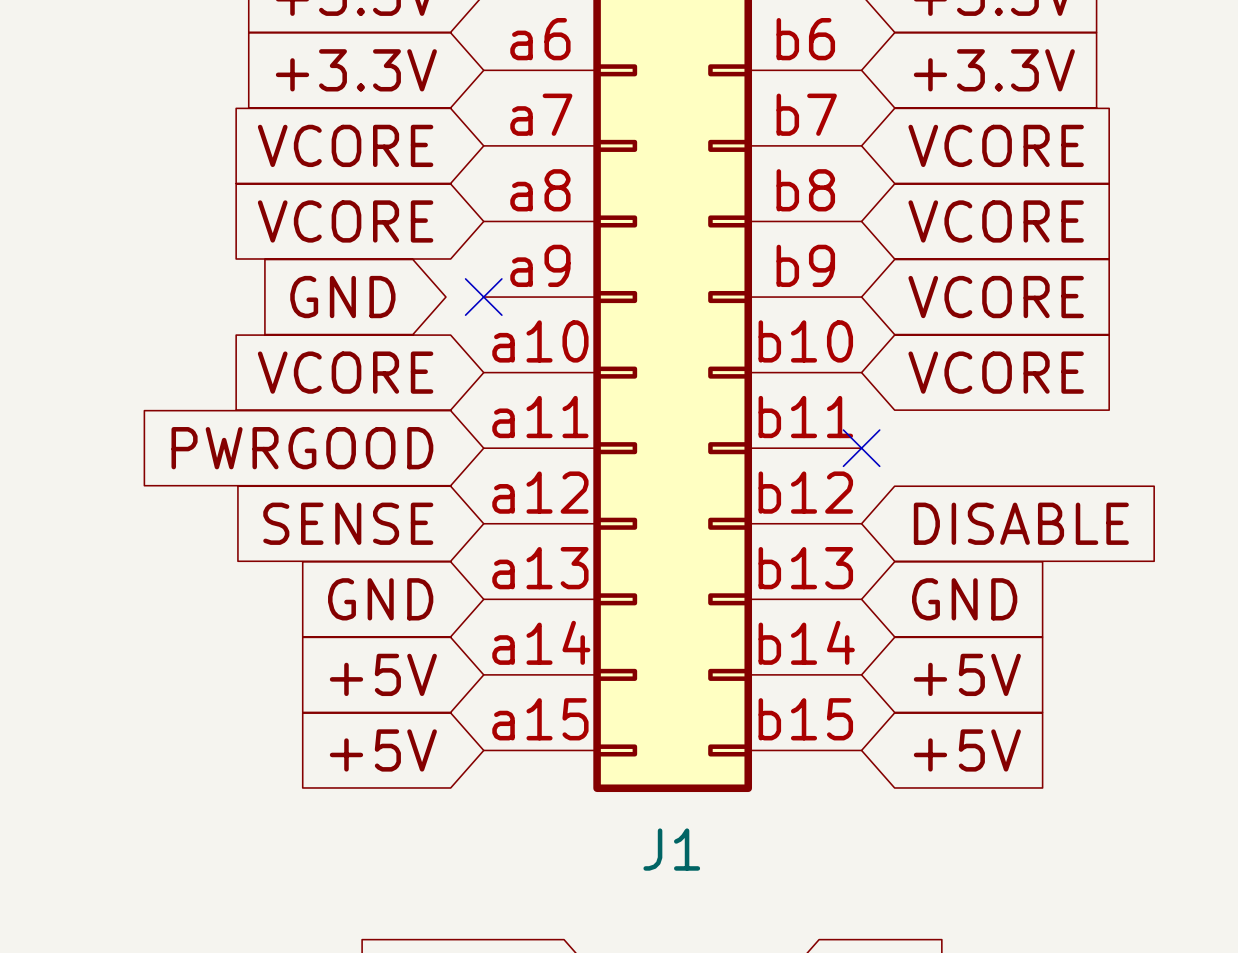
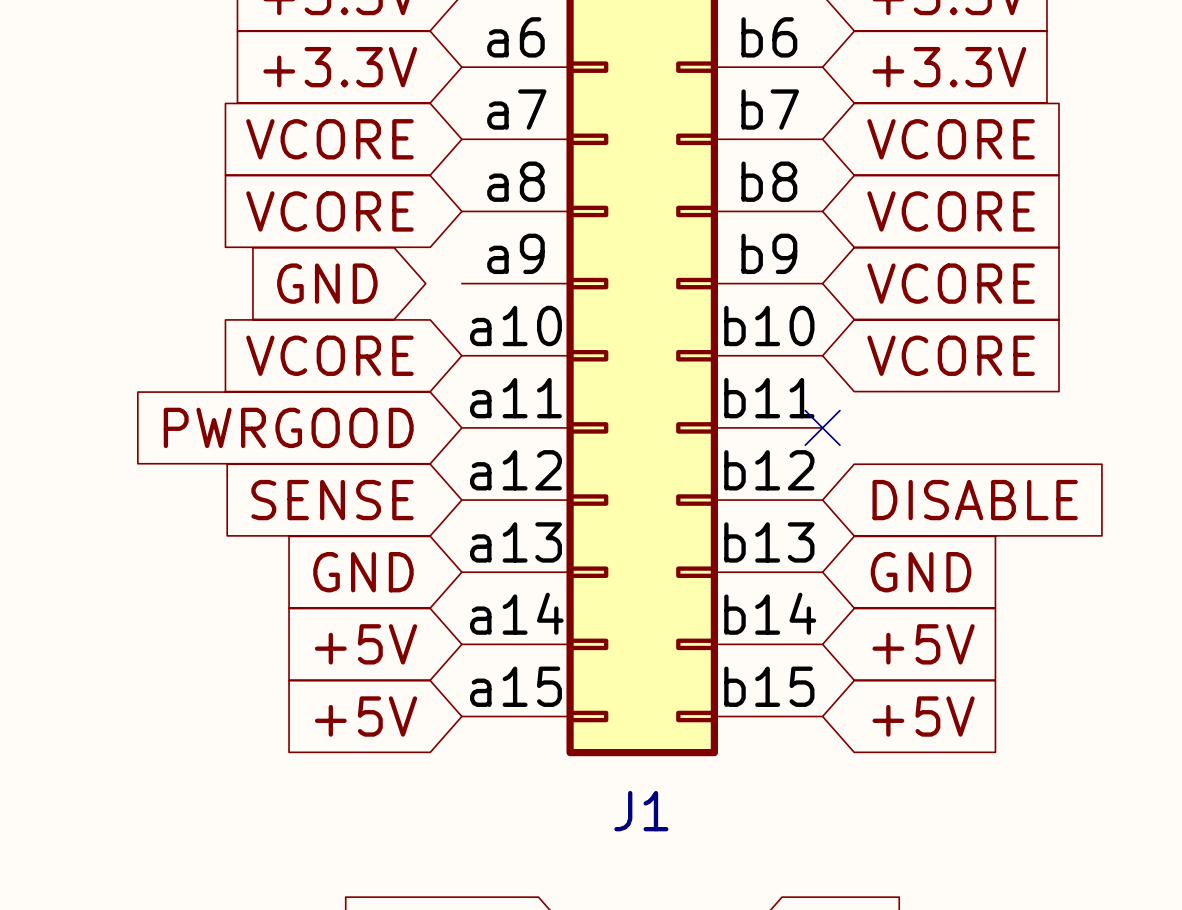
no-connect mark: (483, 297) -> none

